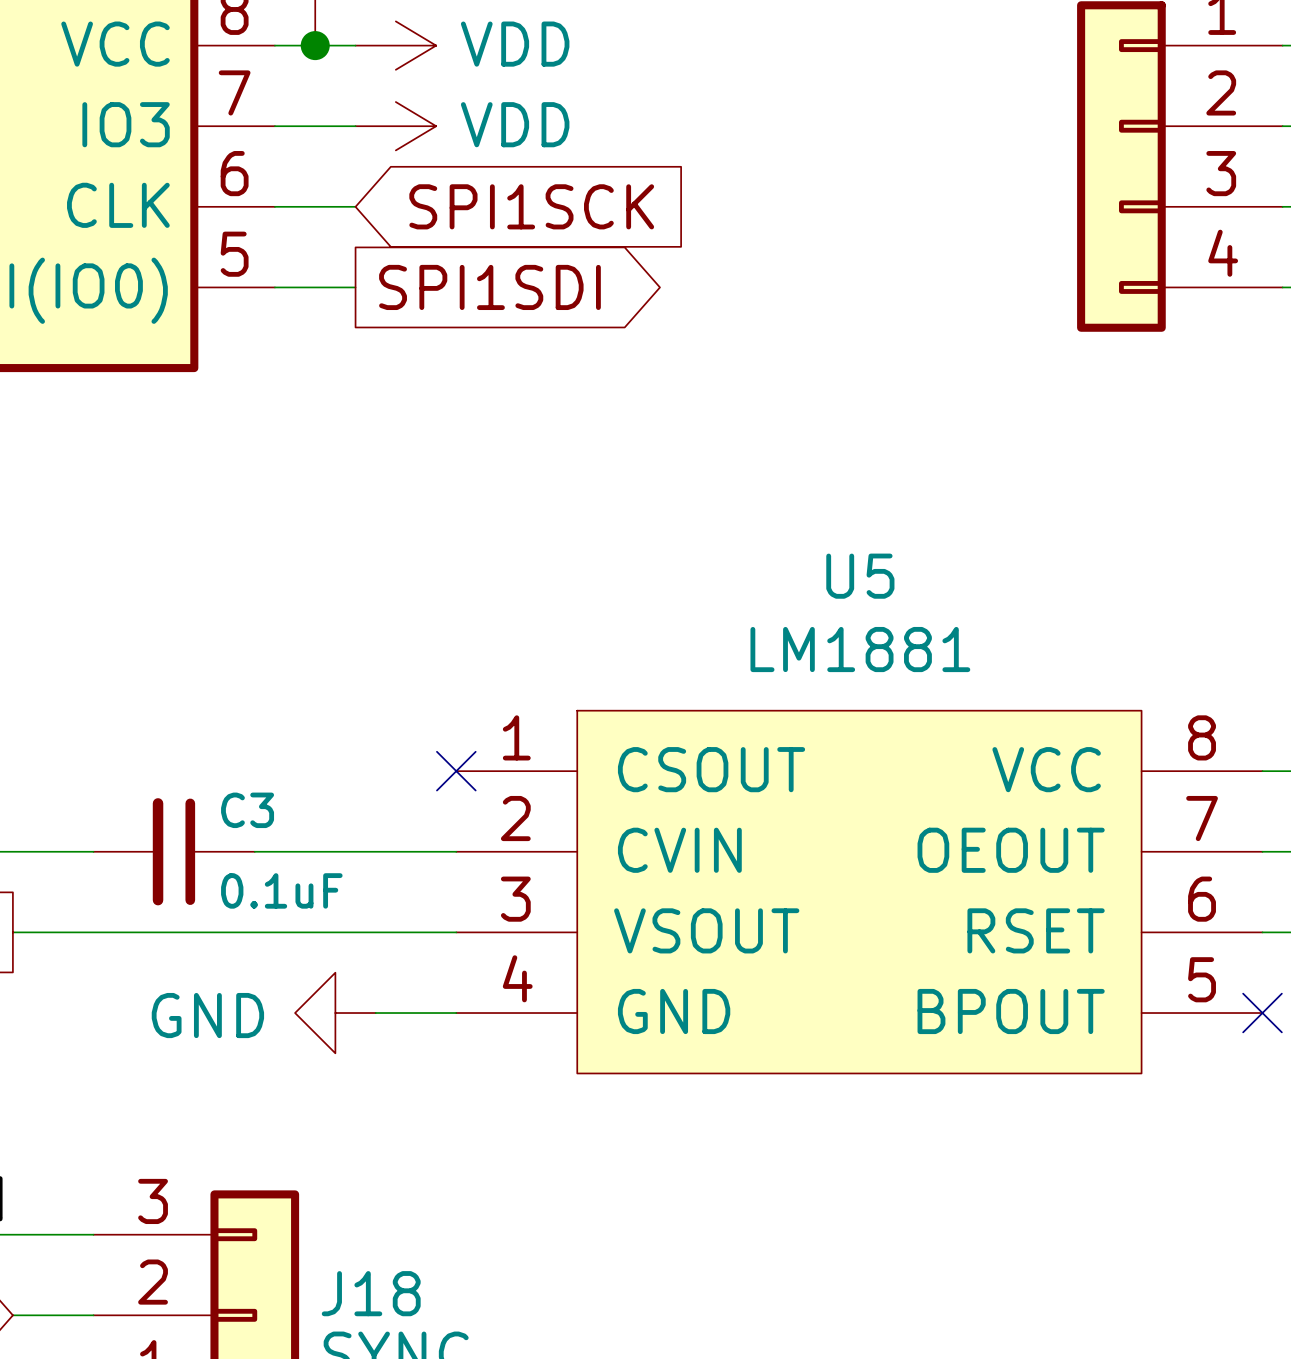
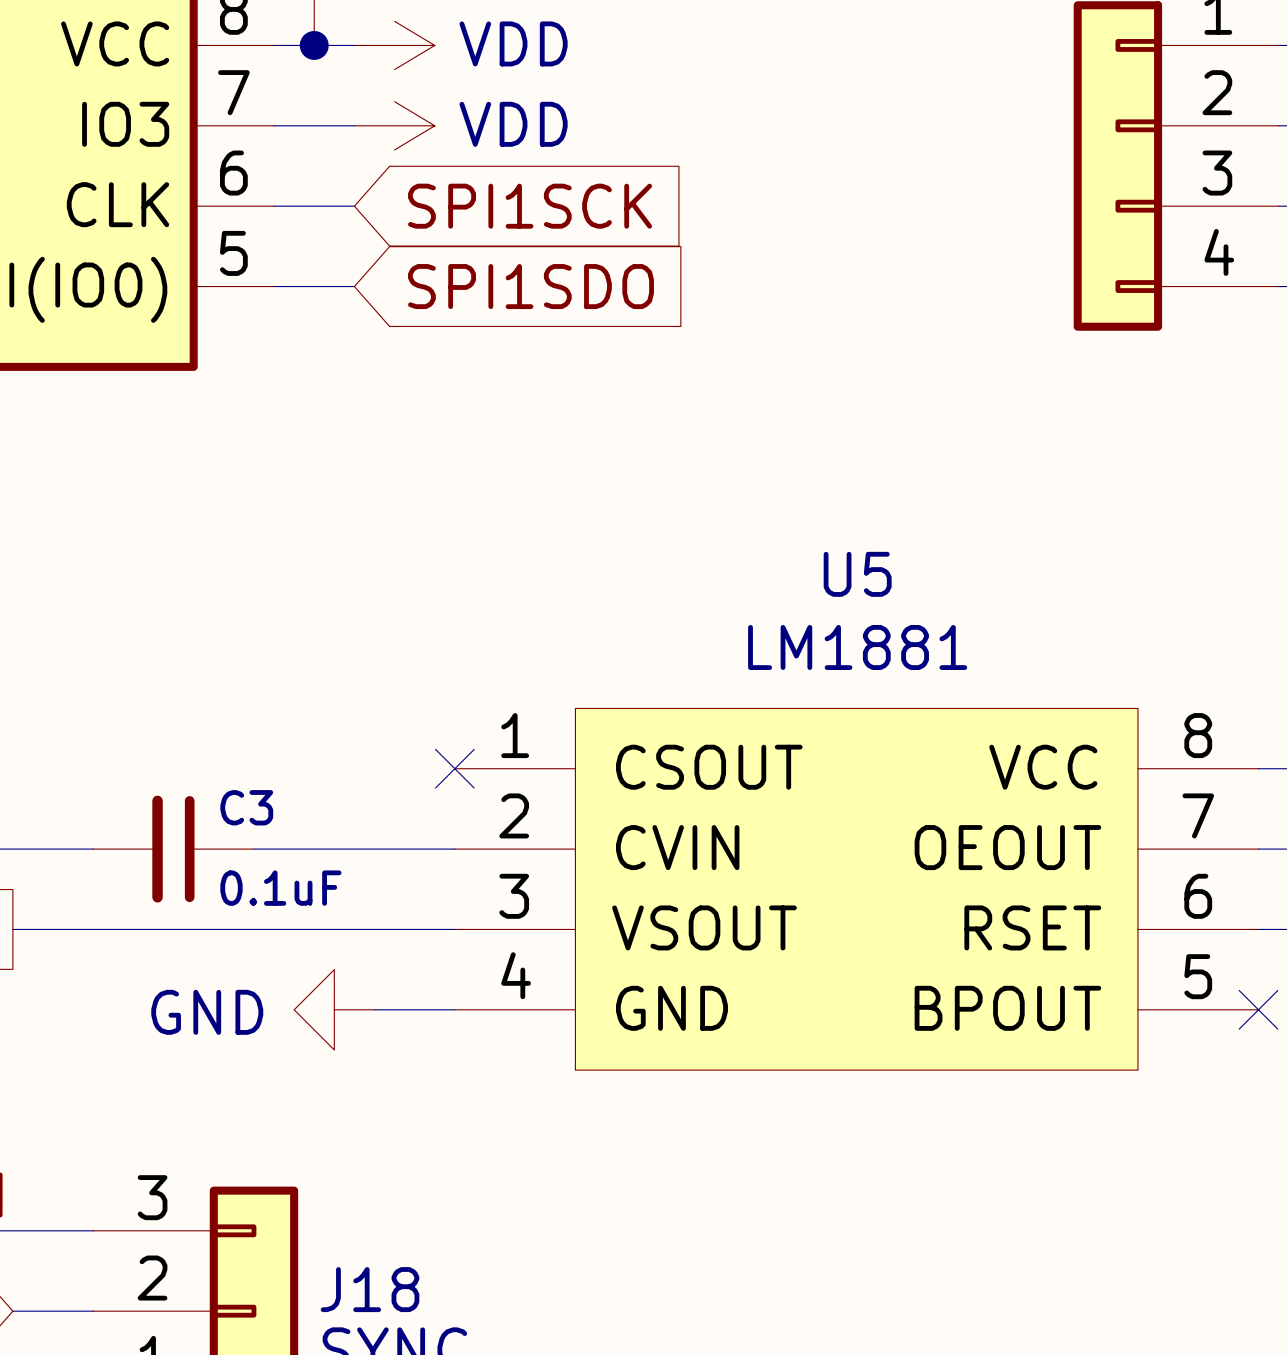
global label shape: output (489, 287) -> input (531, 286)
global label: SPI1SDI (489, 287) -> SPI1SDO (531, 286)

